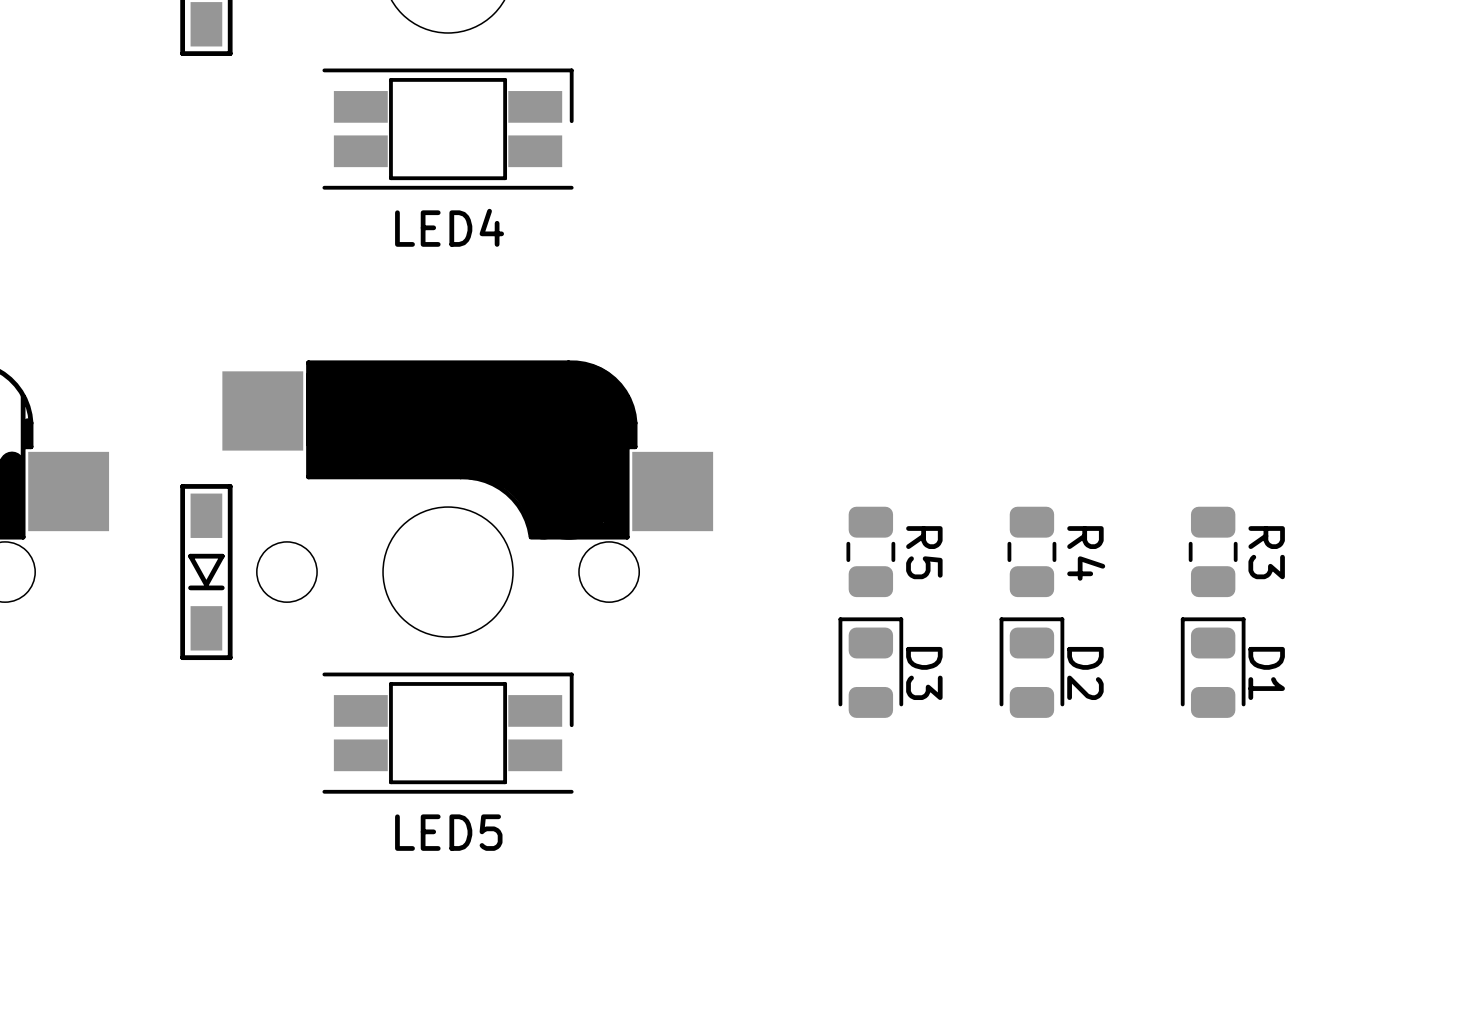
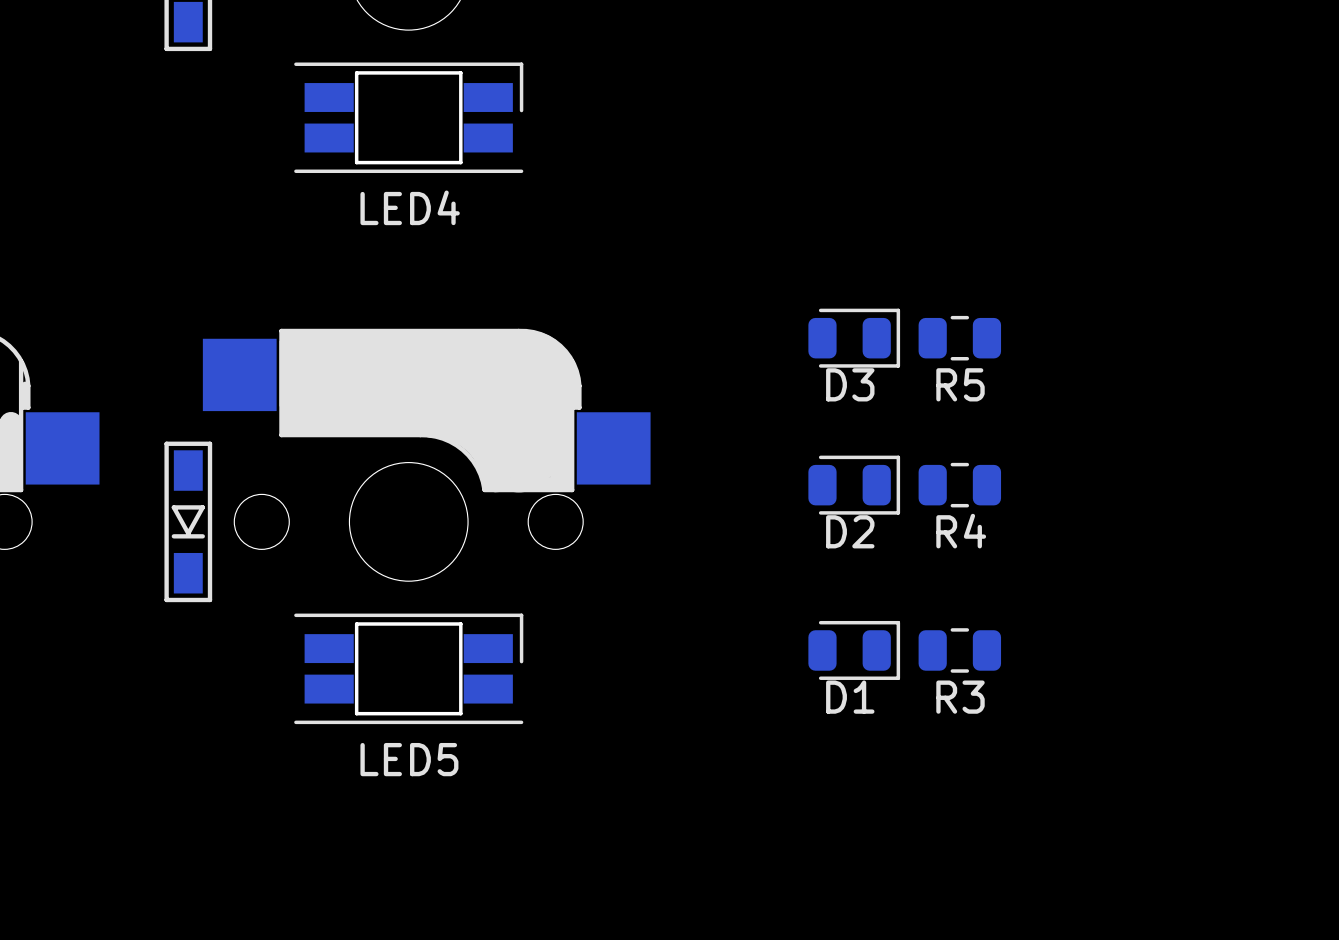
R5 rotation: 0° (870, 551) -> 90° clockwise (959, 338)
R5 position: (870, 551) -> (959, 338)
R4 rotation: 0° (1031, 551) -> 90° clockwise (959, 485)
R3 rotation: 0° (1213, 551) -> 90° clockwise (959, 650)
R3 position: (1213, 551) -> (959, 650)
D3 rotation: 0° (870, 667) -> 90° clockwise (854, 338)
D3 position: (870, 667) -> (854, 338)
D2 rotation: 0° (1031, 667) -> 90° clockwise (854, 485)
D2 position: (1031, 667) -> (854, 485)
D1 rotation: 0° (1213, 667) -> 90° clockwise (854, 650)
D1 position: (1213, 667) -> (854, 650)

